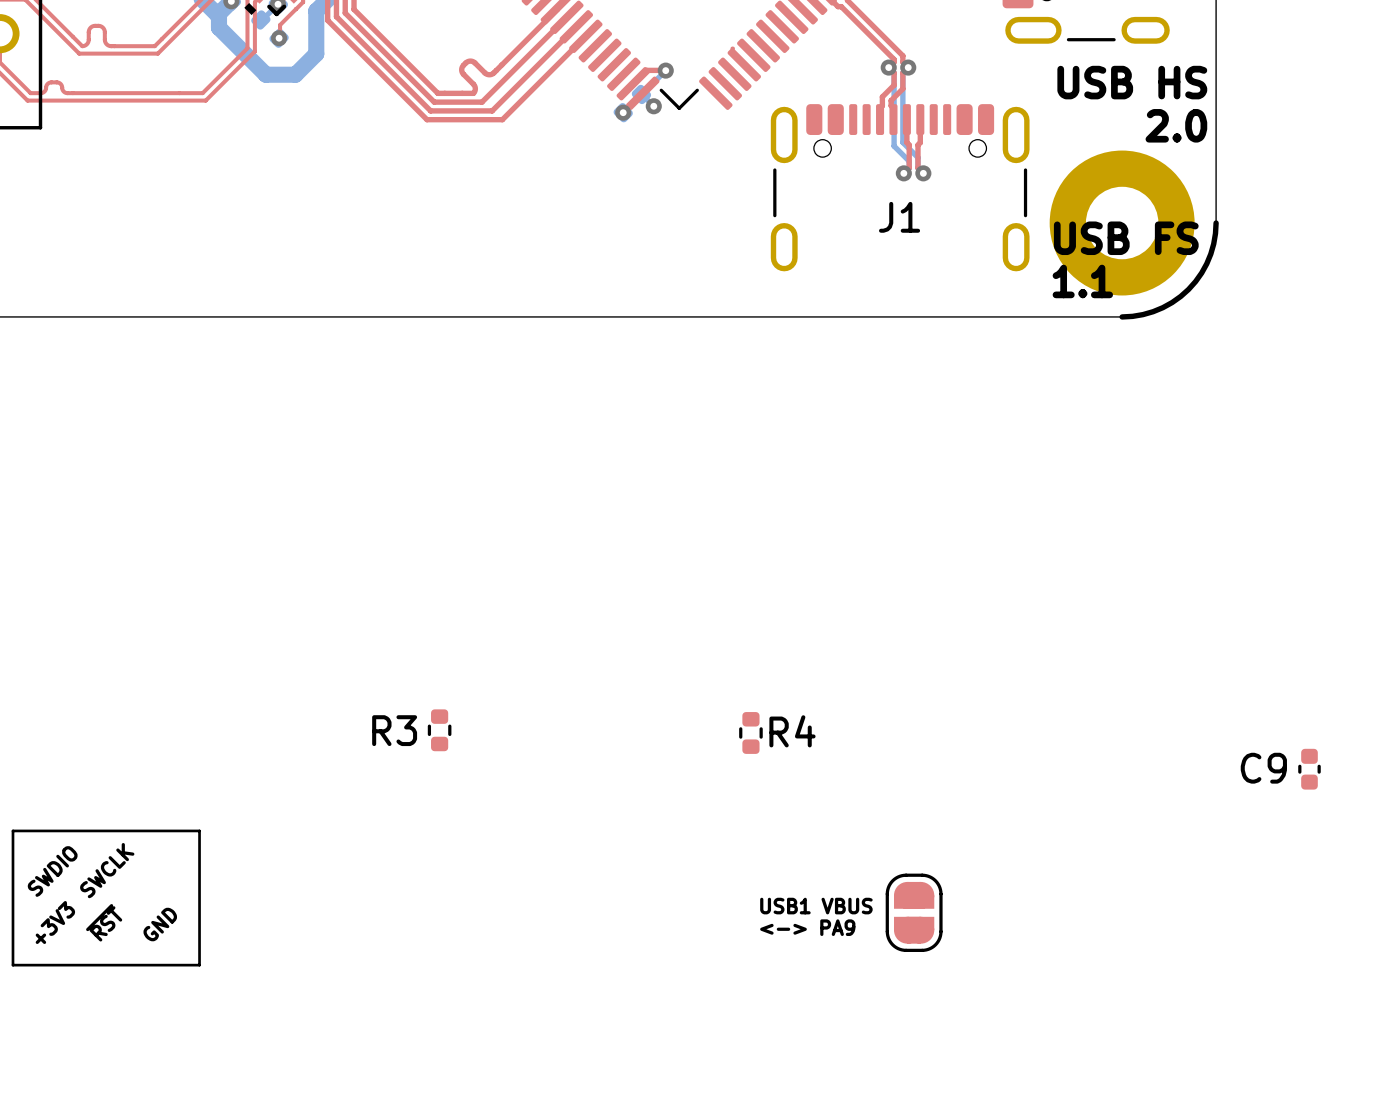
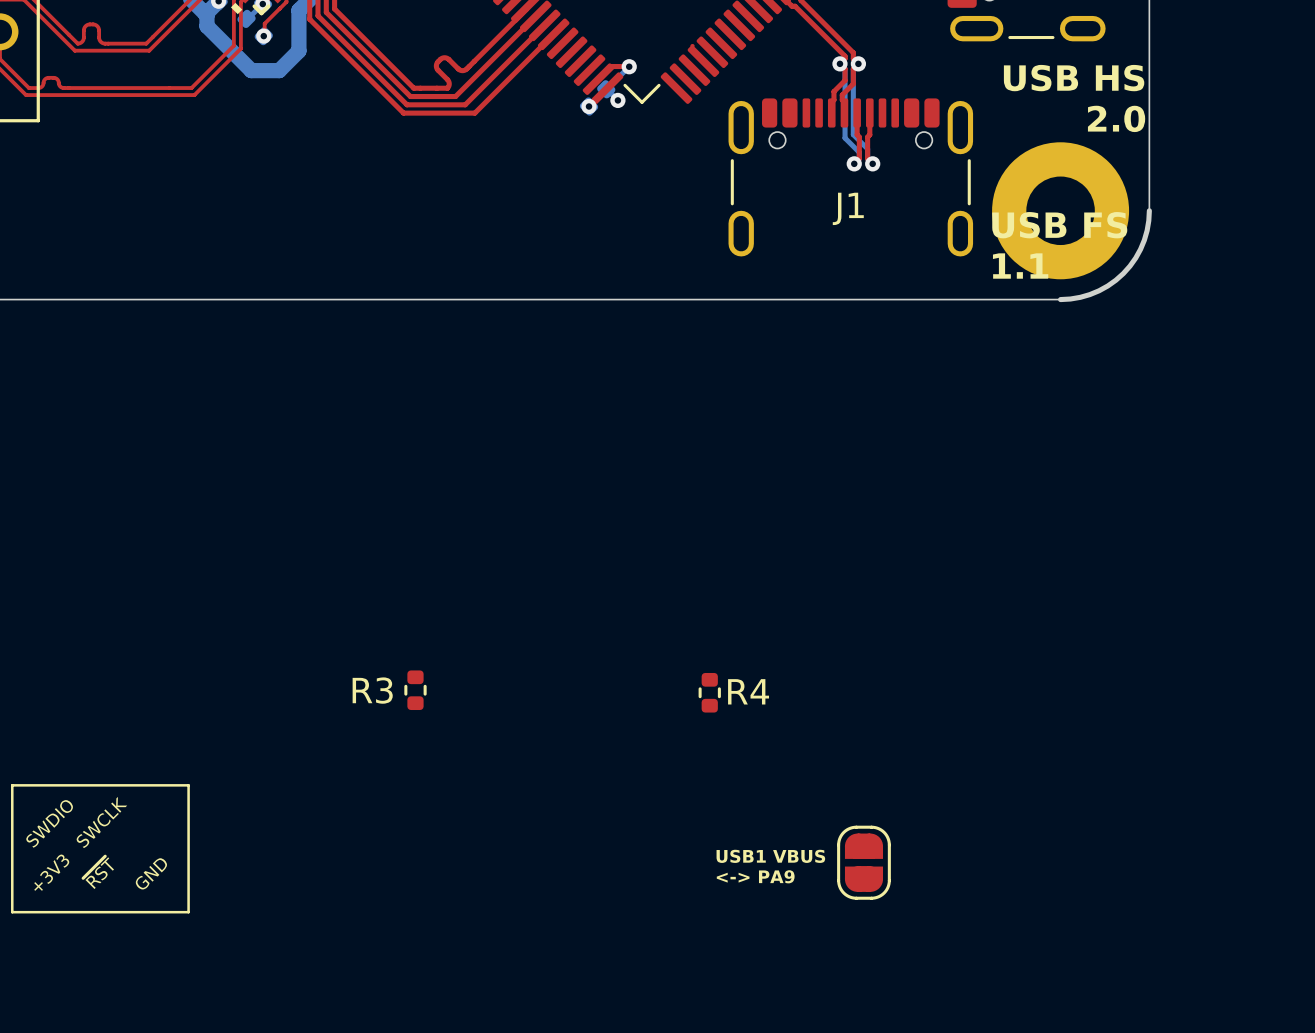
C9: (1309, 769) -> none

